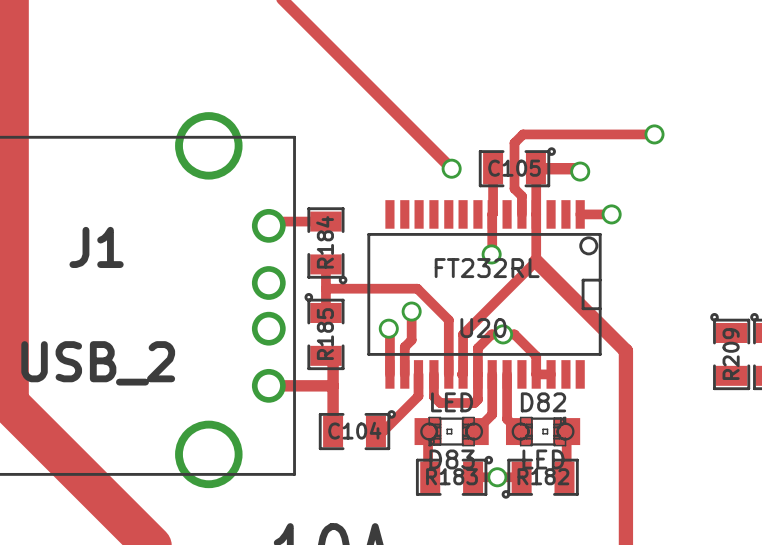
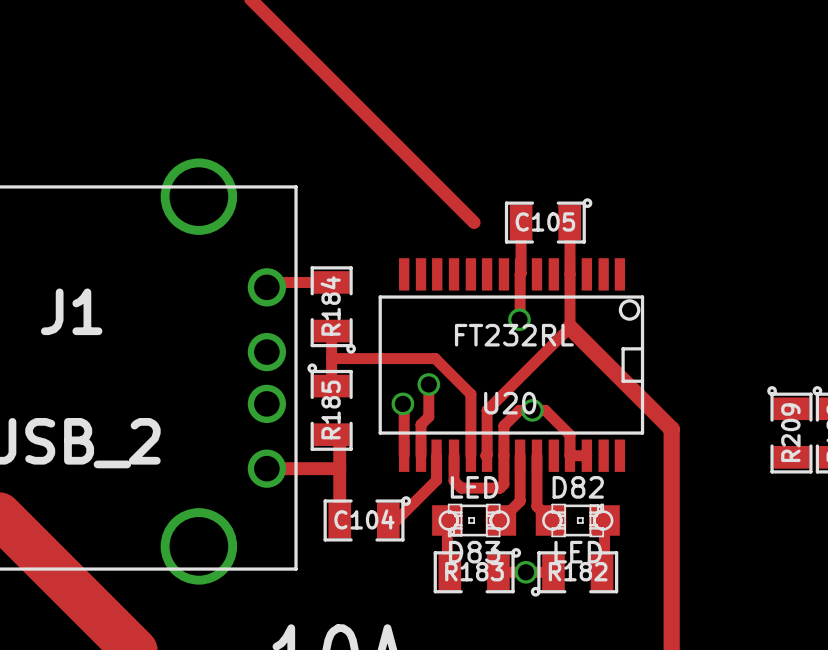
track: (654, 134) (523, 134) (514, 143) (514, 188) (521, 196) (521, 214) -> none
via: (654, 134) -> none
via: (451, 168) -> none
track: (535, 168) (577, 168) (580, 171) -> none
via: (580, 171) -> none
track: (580, 214) (611, 214) -> none
via: (611, 214) -> none

